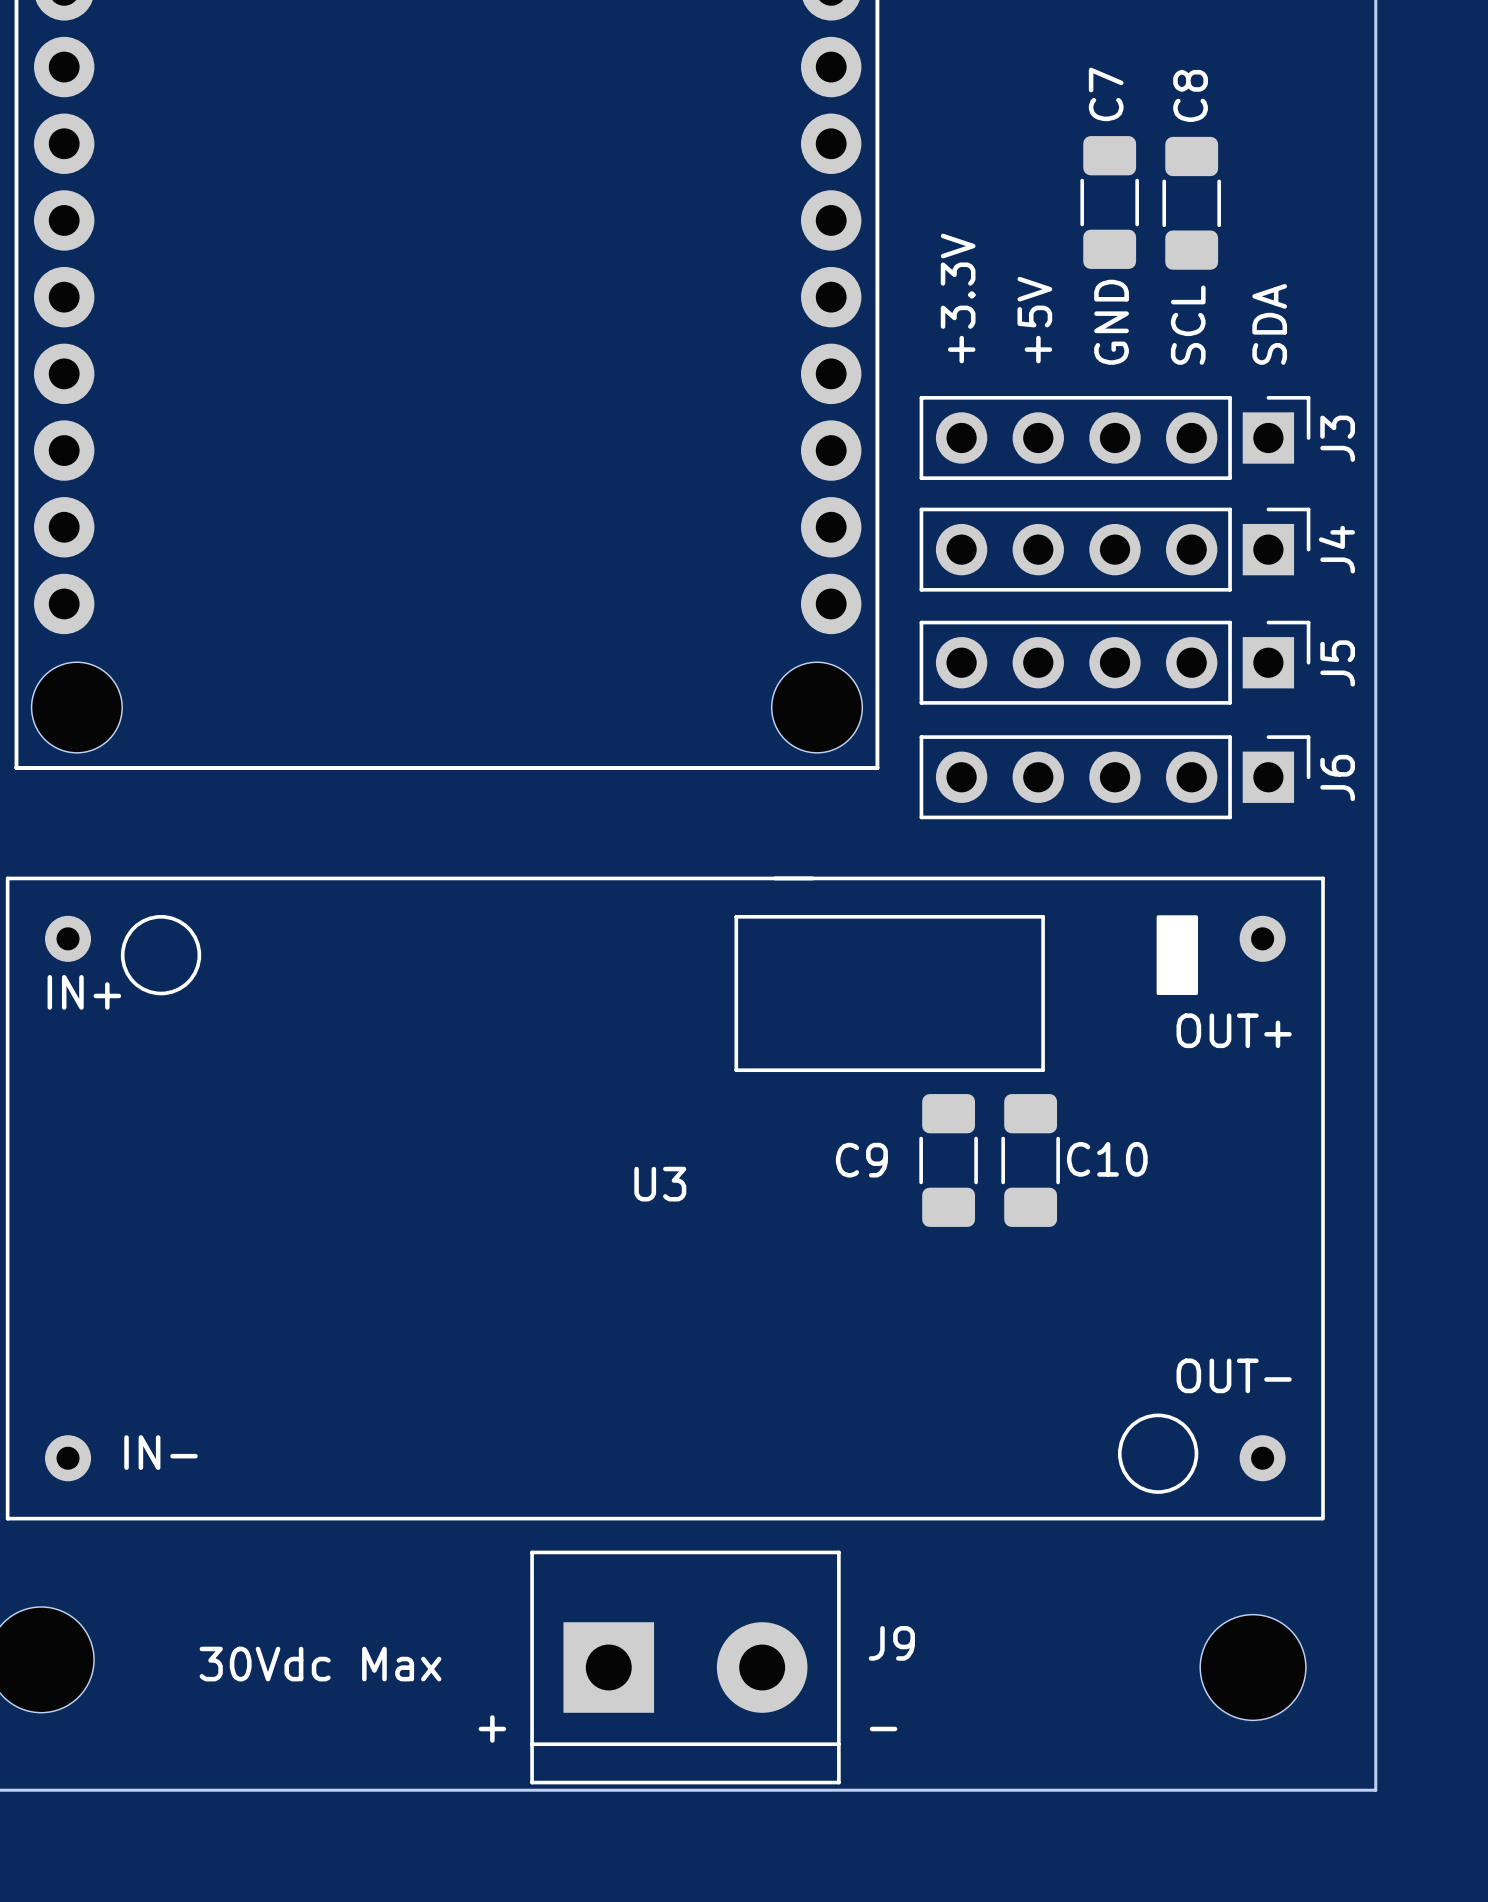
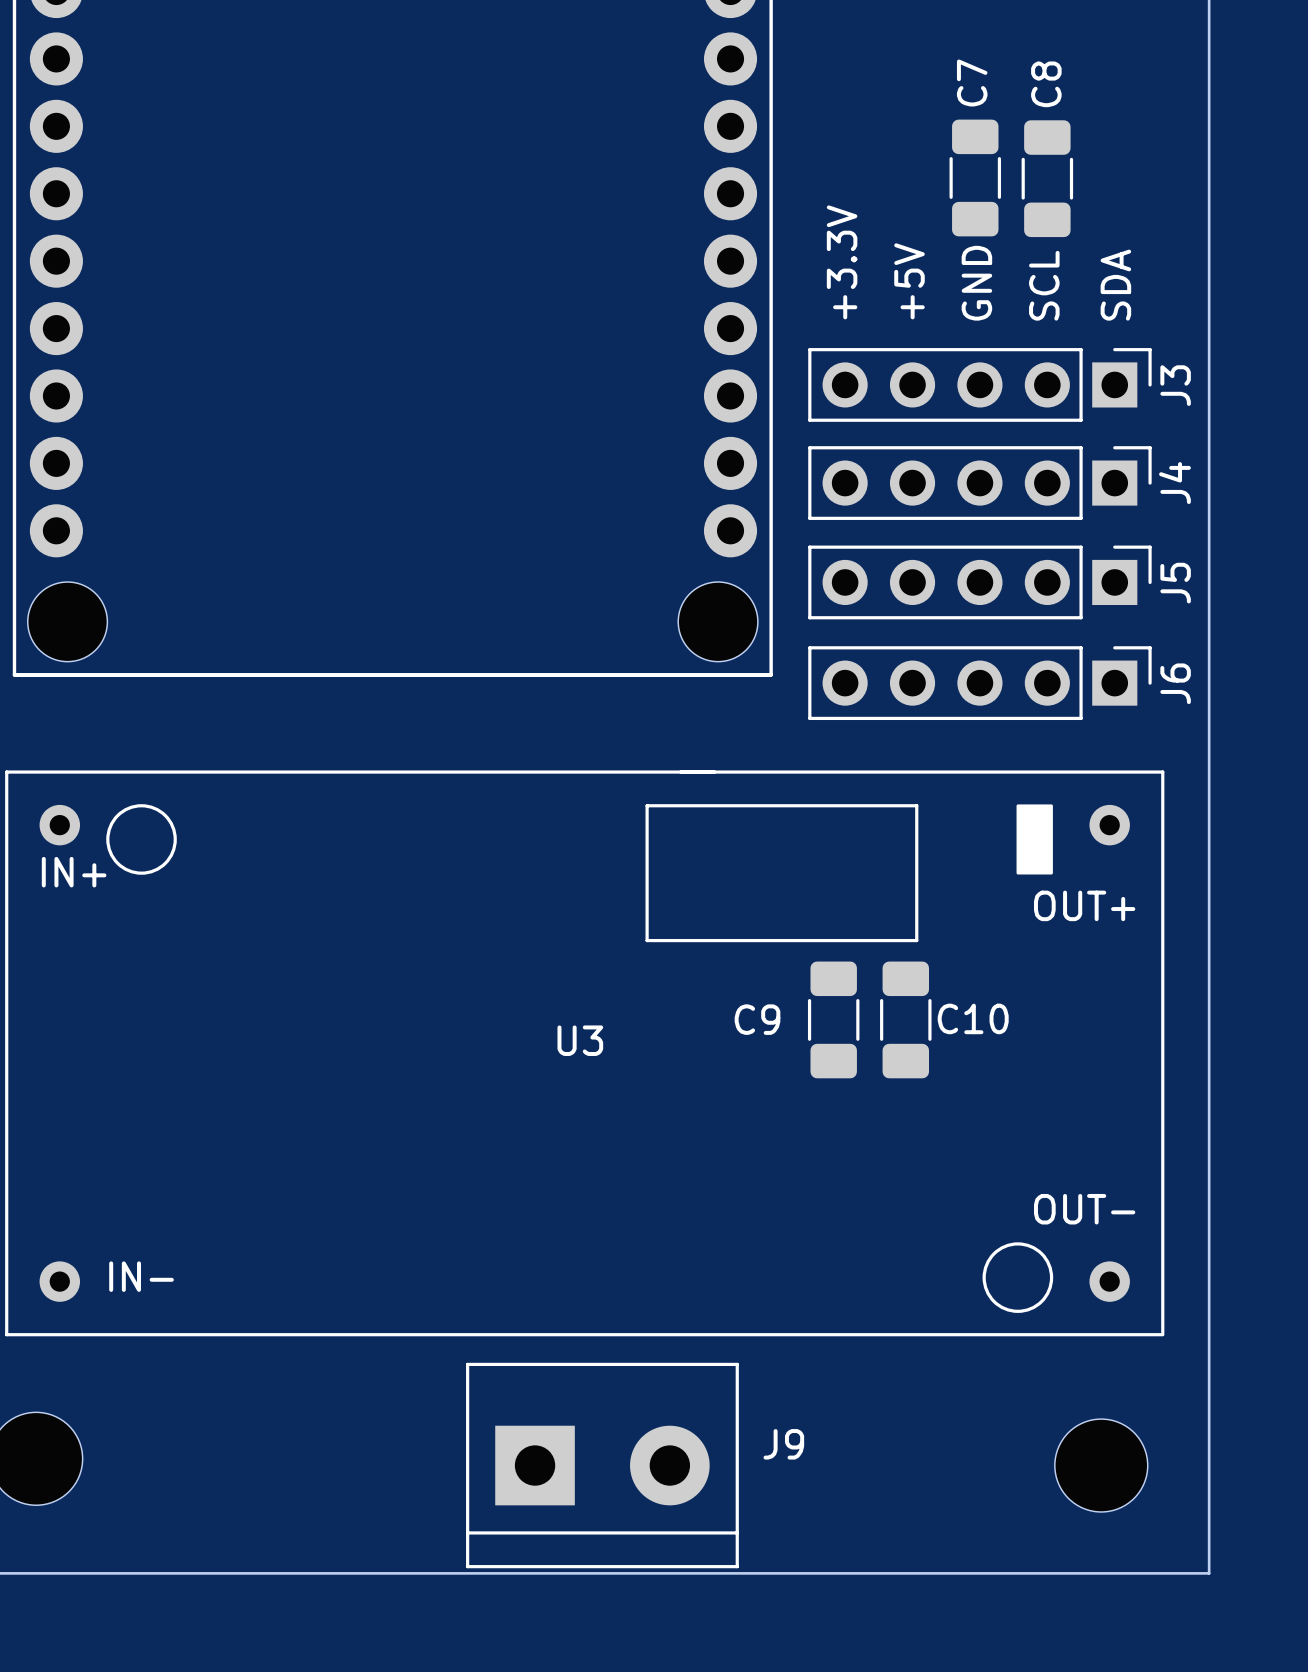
text: 30Vdc Max (320, 1664) -> none
text: + (492, 1729) -> none
text: - (883, 1729) -> none

